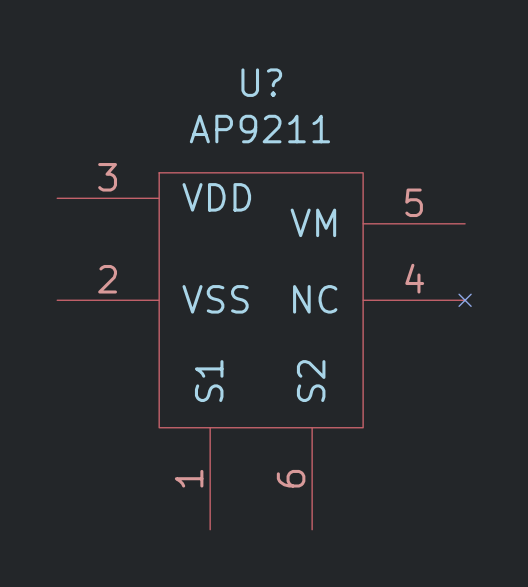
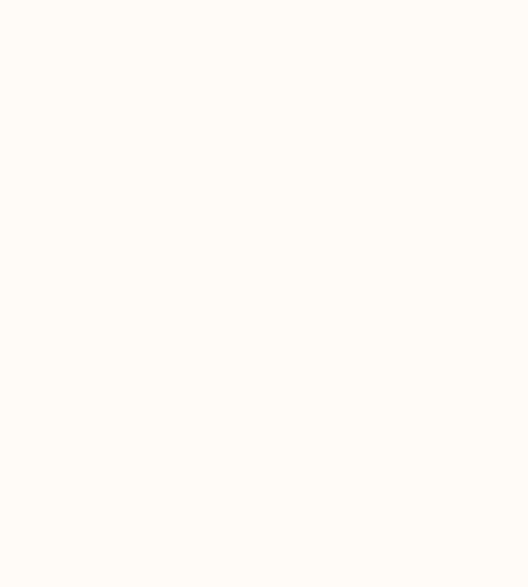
U?: AP9211 (264, 351) -> none

